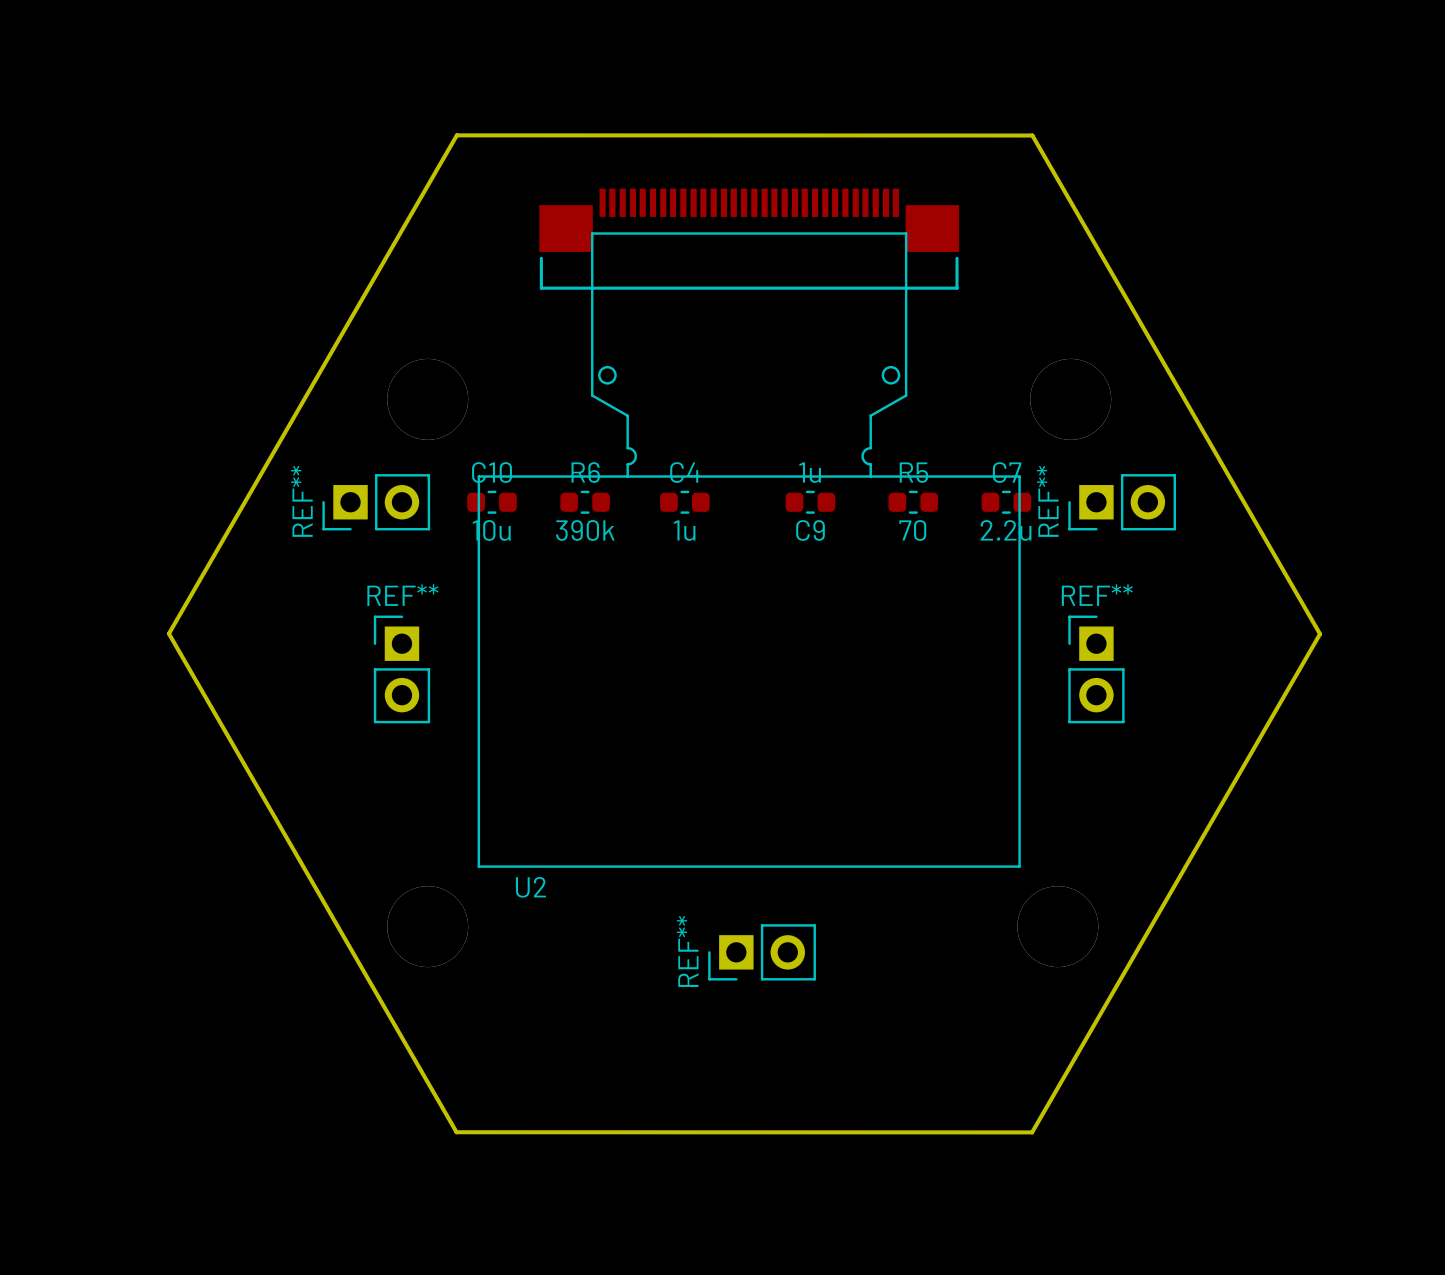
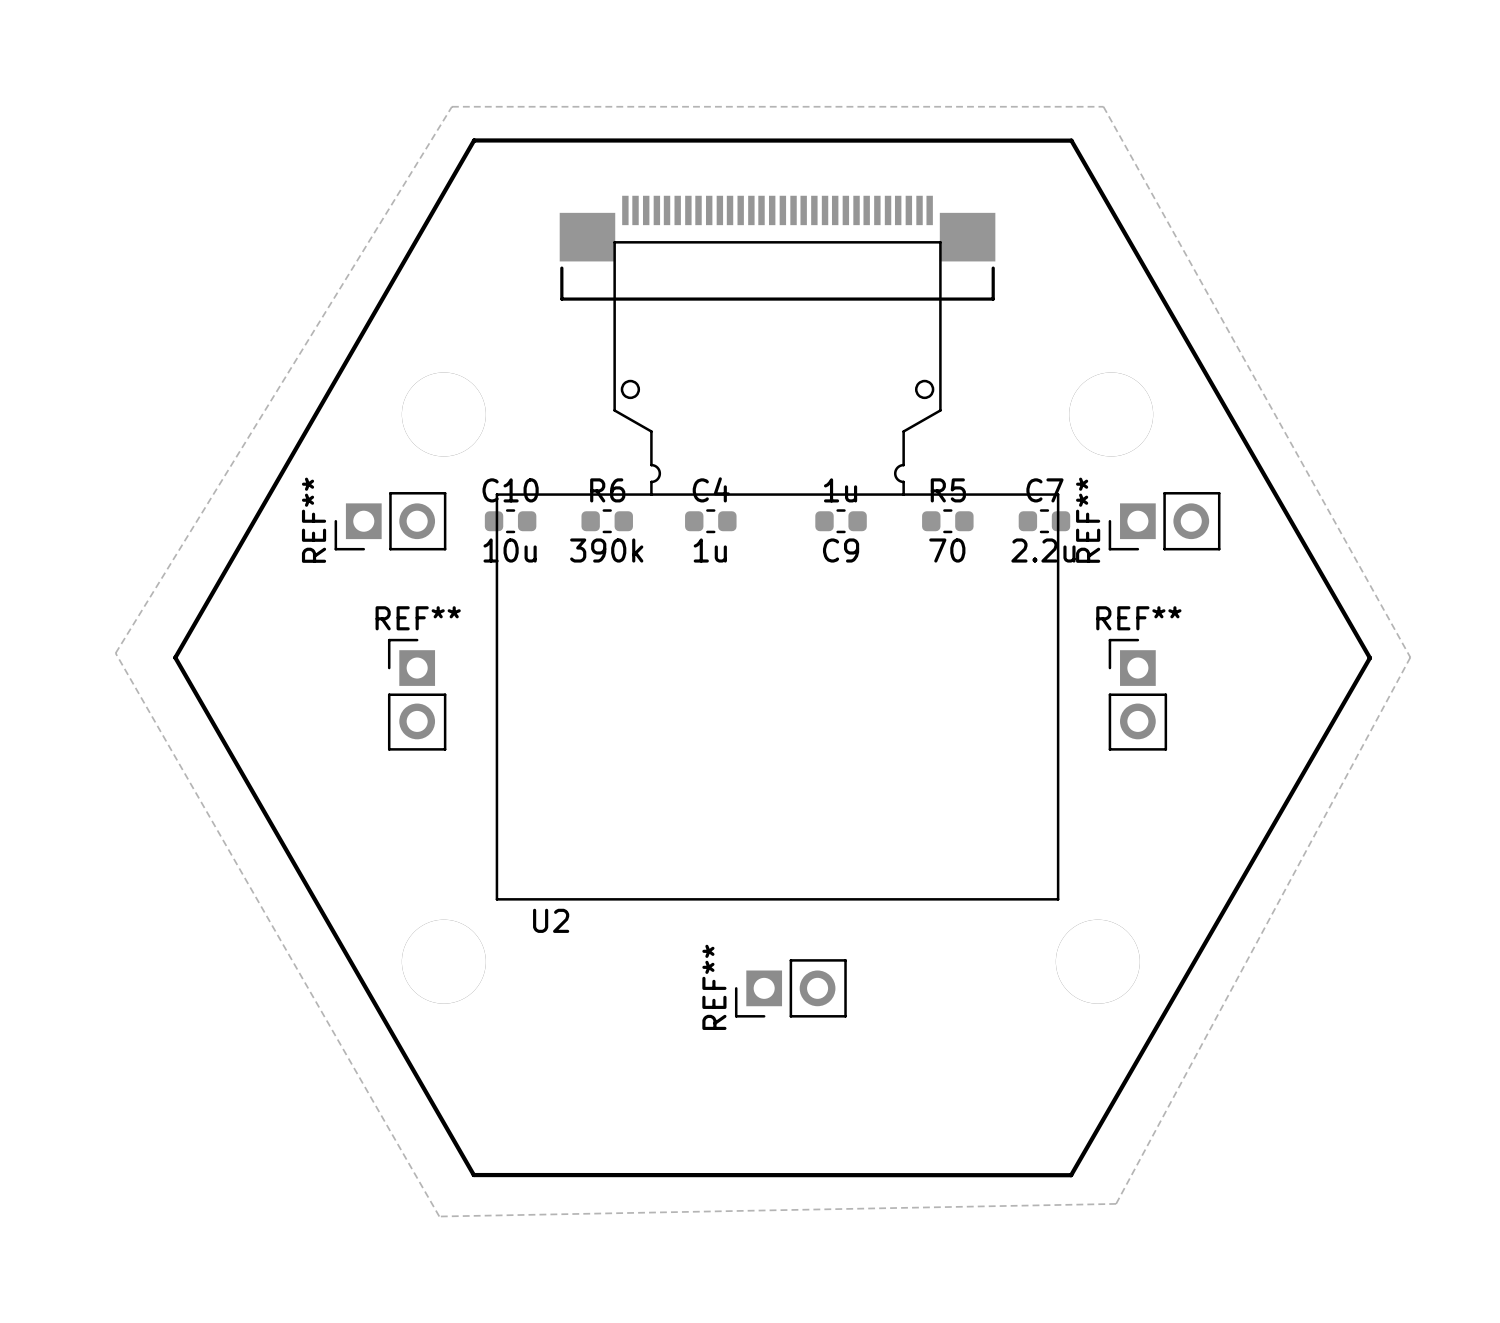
zone outline: none -> (451, 106) (115, 653) (439, 1216) (1116, 1203) (1410, 657) (1103, 106) (451, 106)

